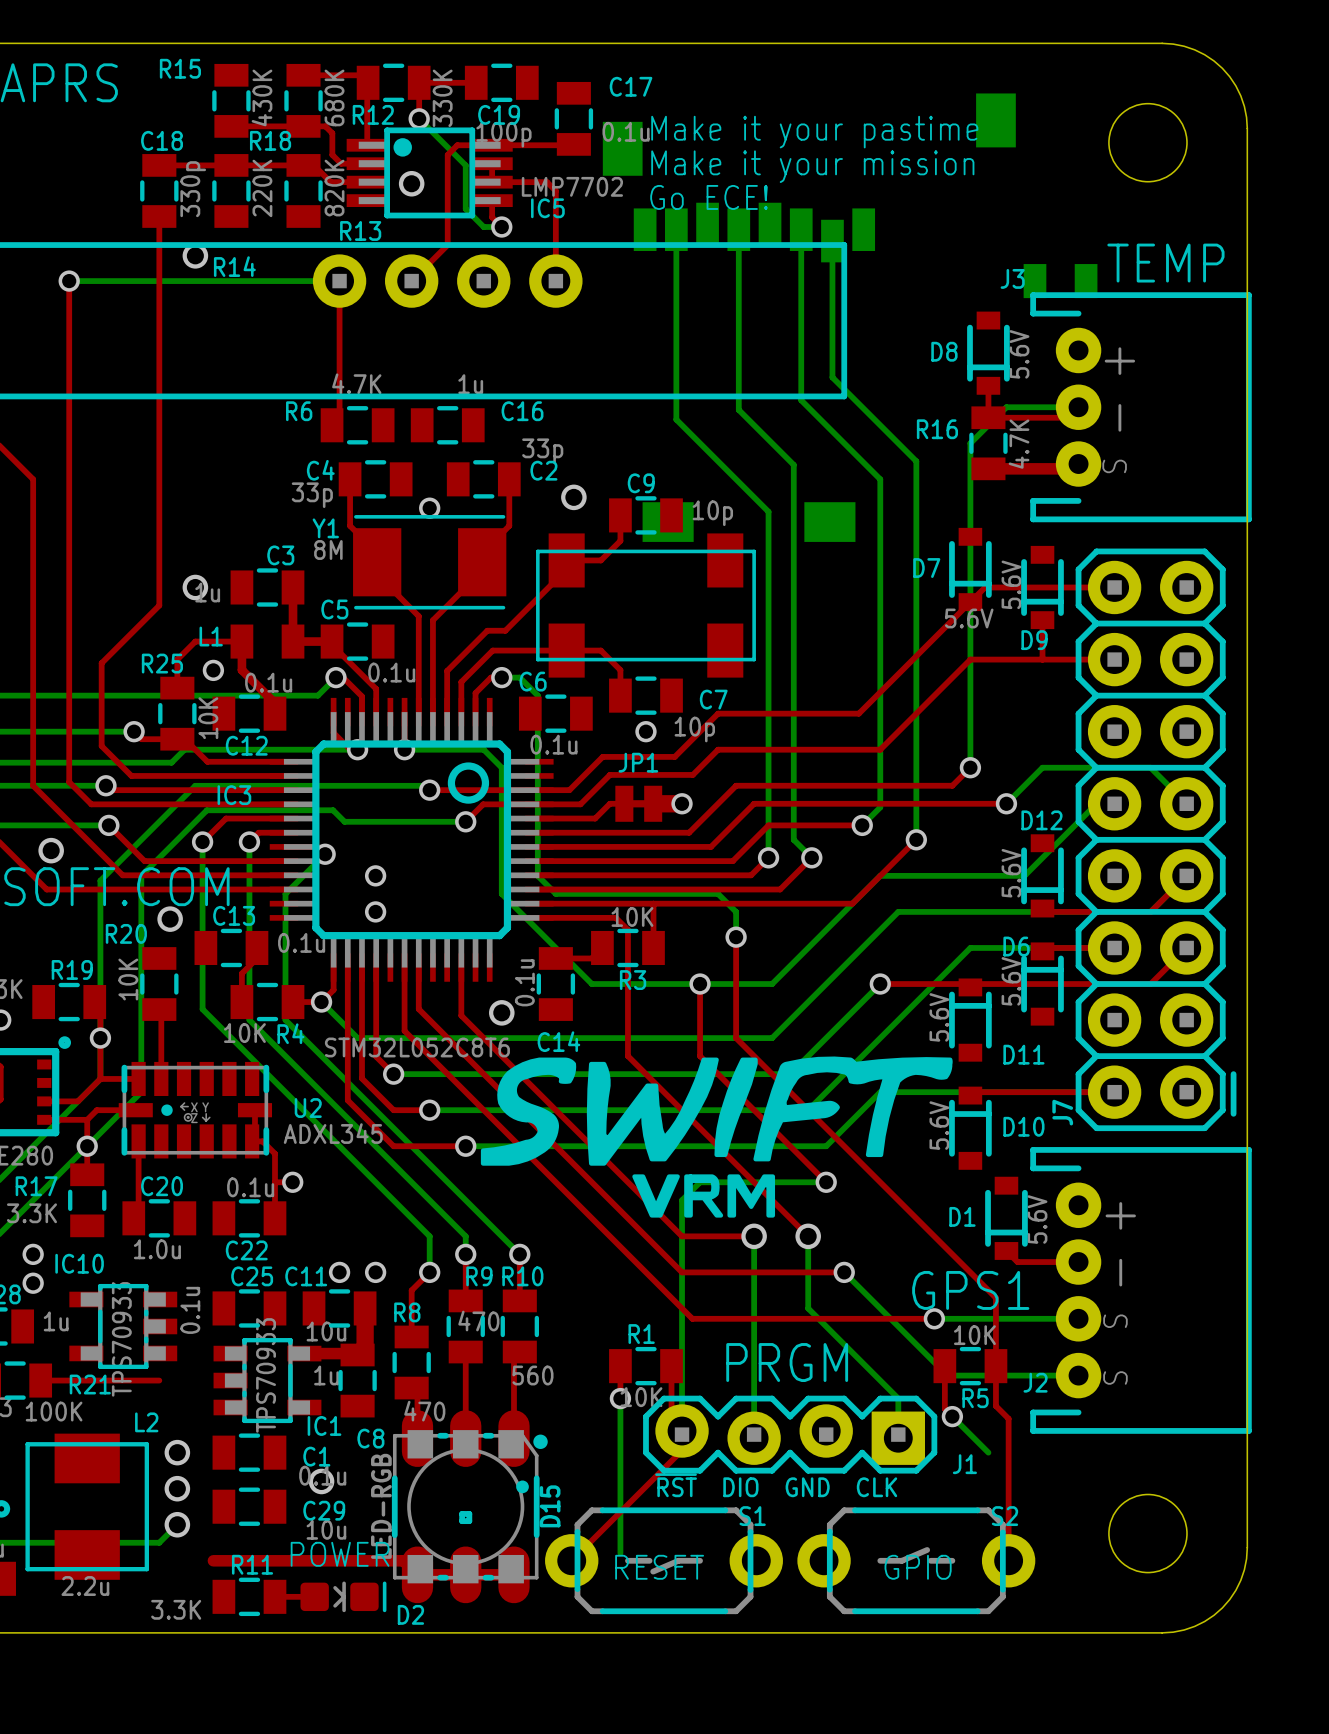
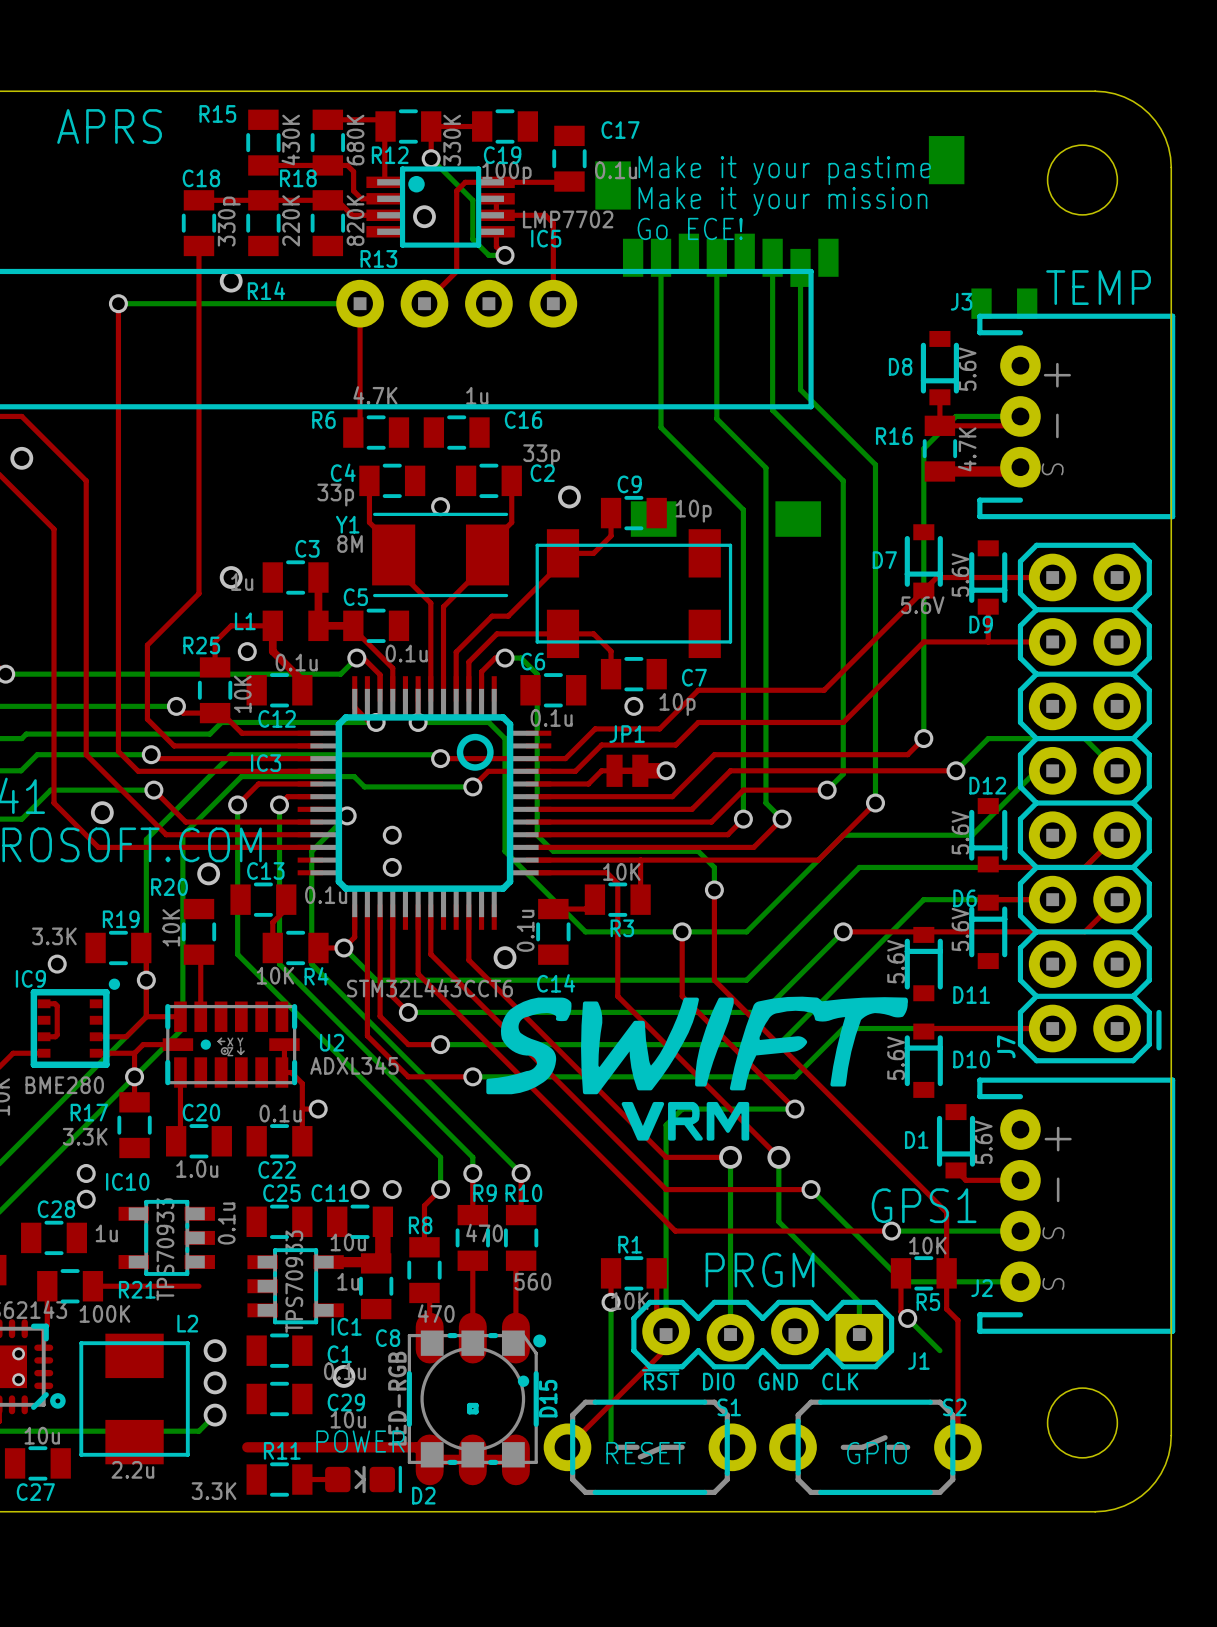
IC3 value: STM32L052C8T6 (417, 1047) -> STM32L443CCT6 (429, 988)

